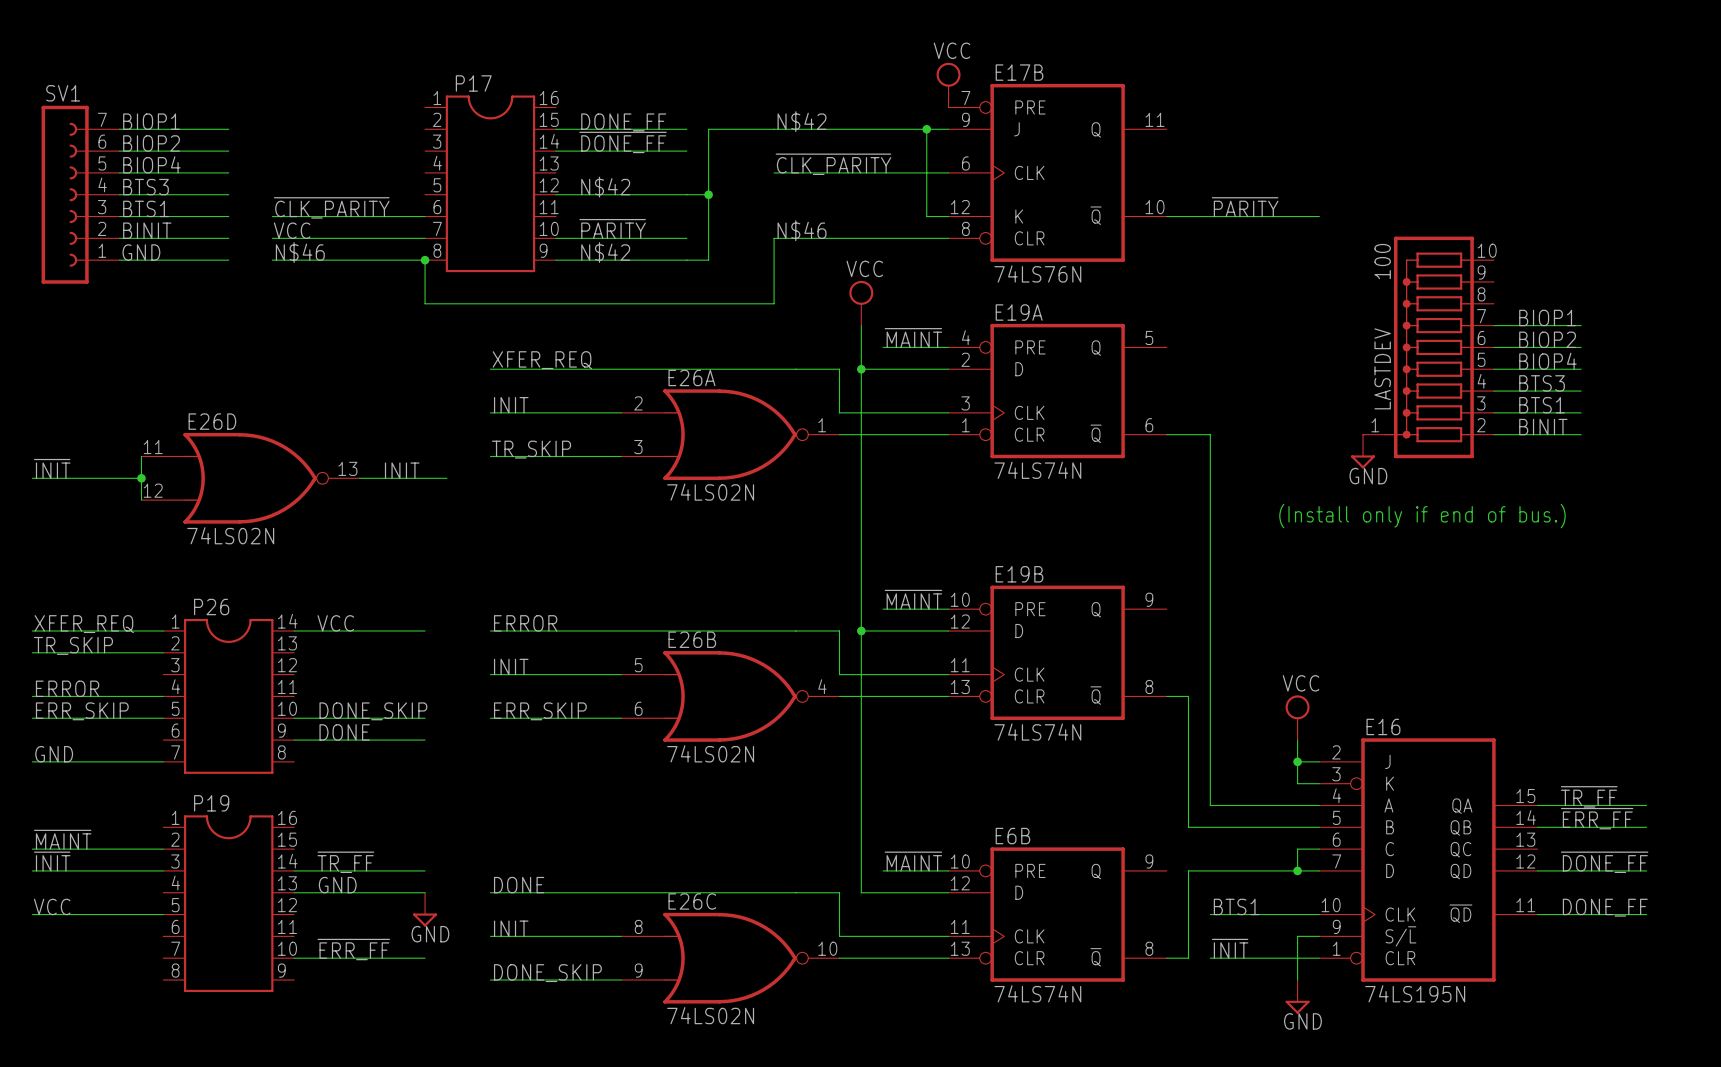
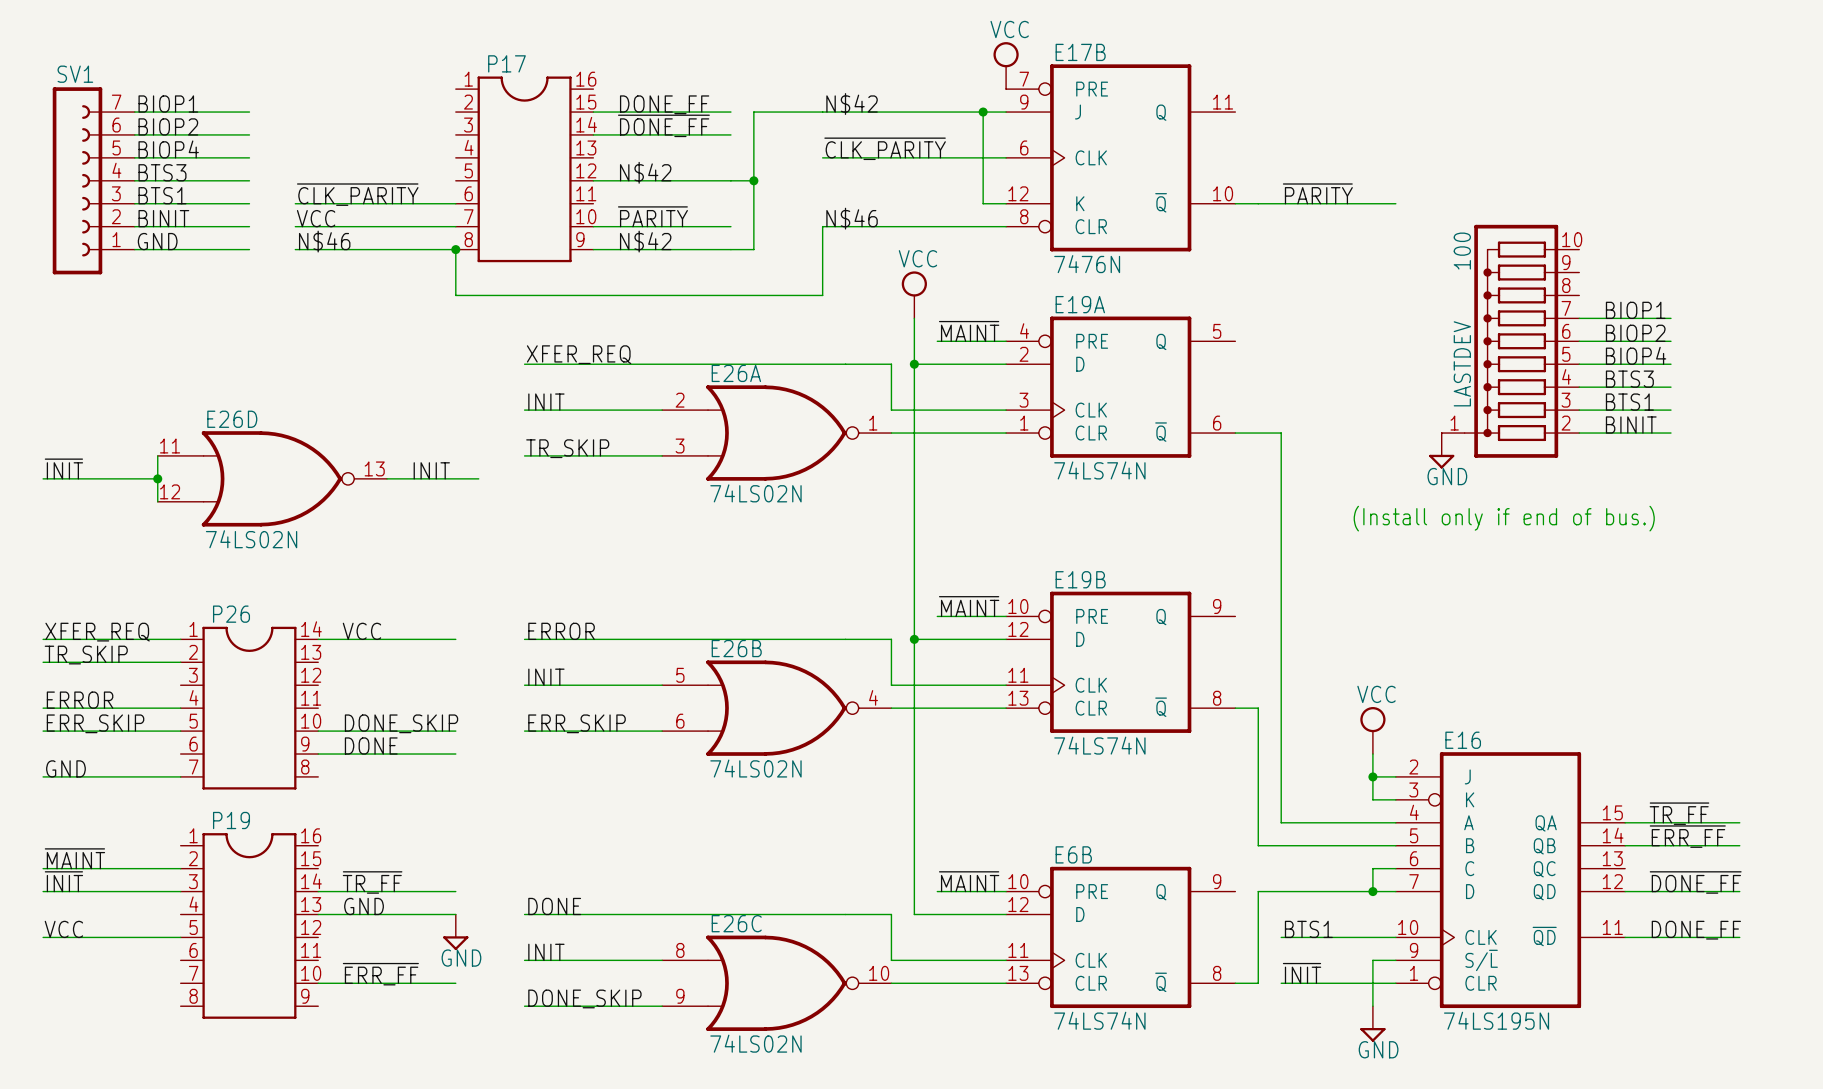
E17B value: 74LS76N (1037, 273) -> 7476N (1087, 264)

